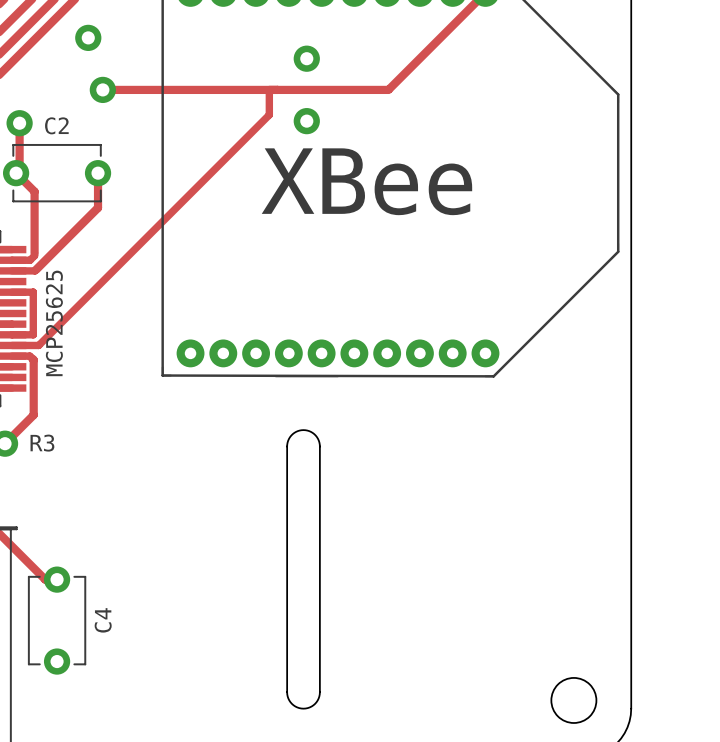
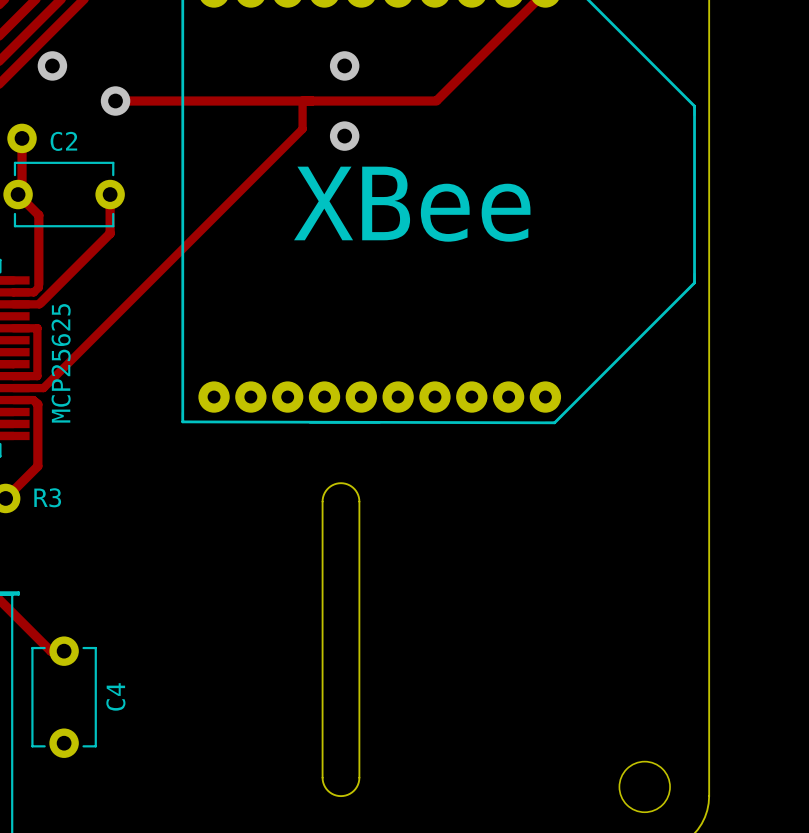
via position: (88, 37) -> (52, 65)

